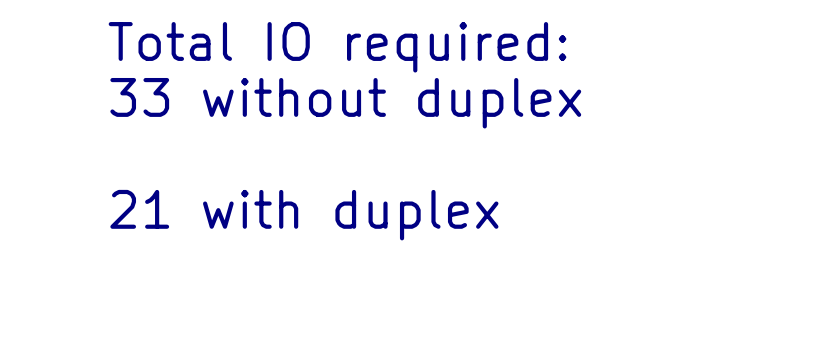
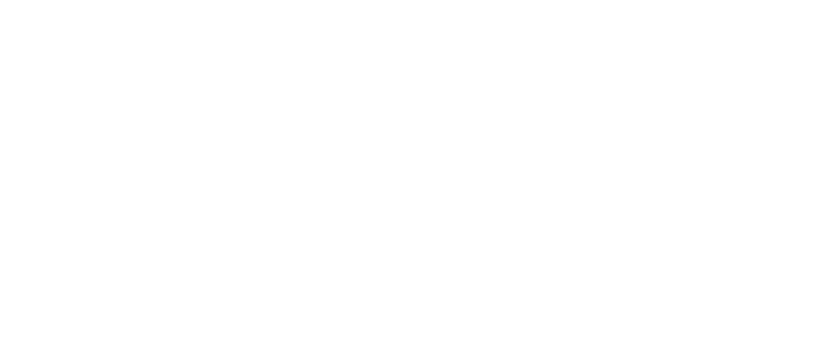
text: Total IO required: (337, 47) -> none
text: 33 without duplex (345, 103) -> none
text: 21 with duplex (304, 215) -> none

